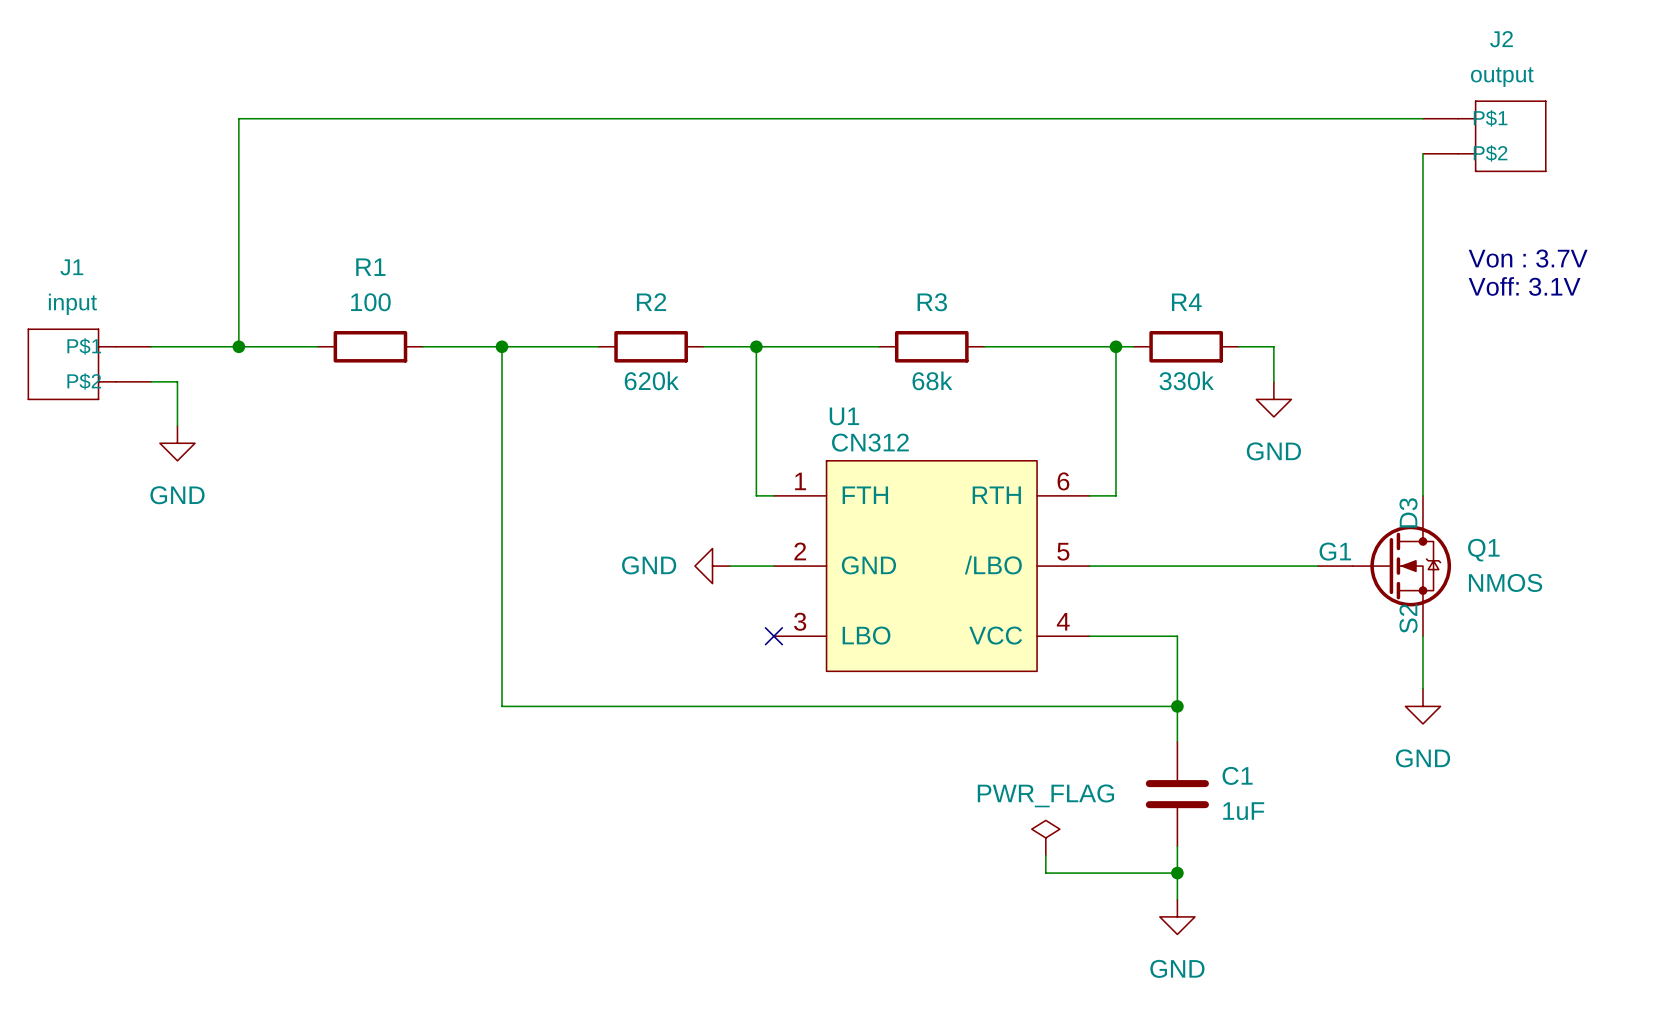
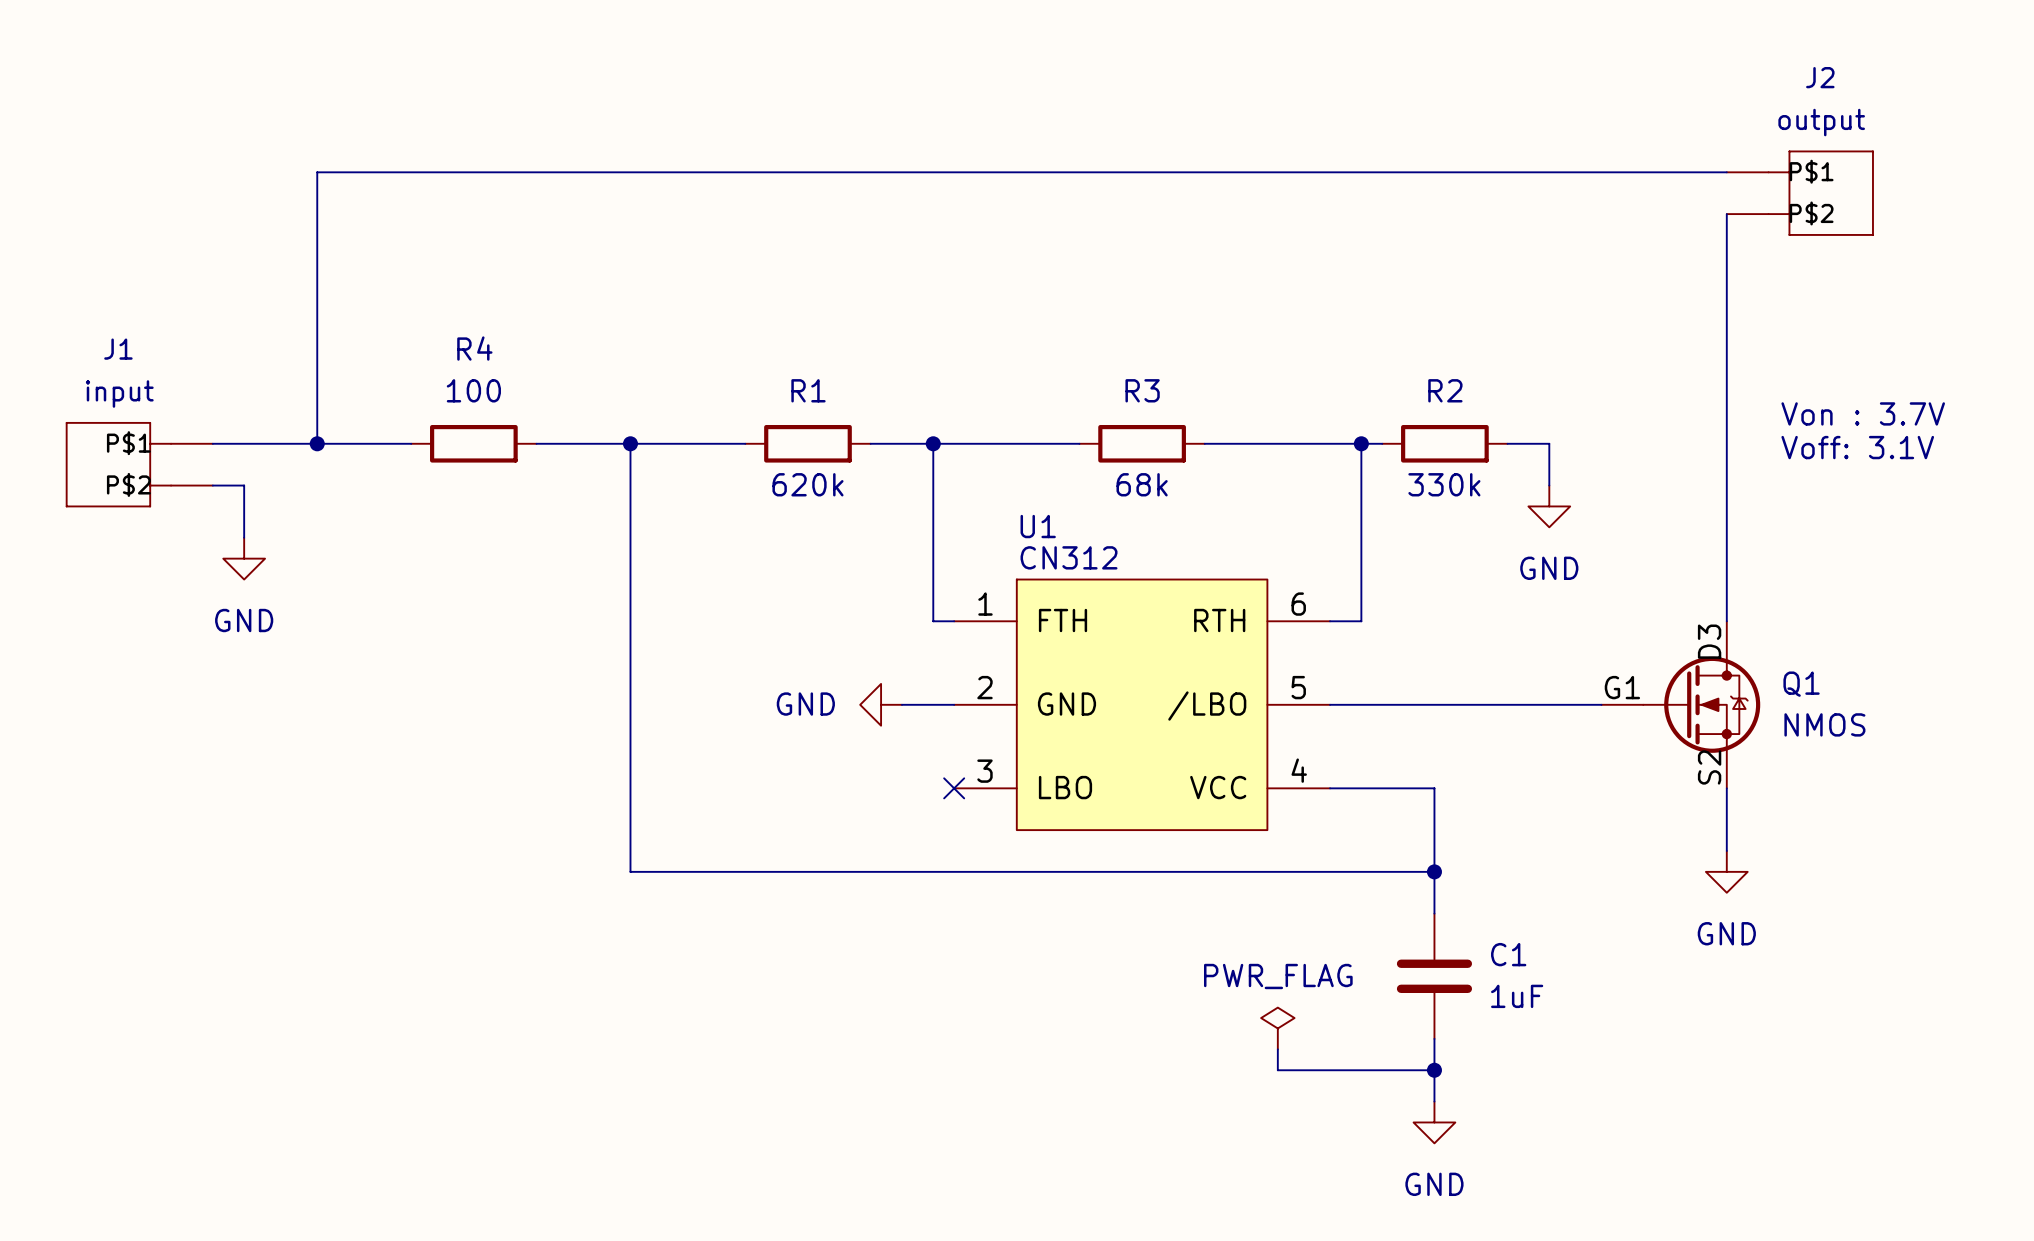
text position: Von : 3.7V (1528, 258) -> Von : 3.7V (1863, 413)
R1 name: R1 (370, 267) -> R4 (474, 348)
text position: Voff: 3.1V (1524, 286) -> Voff: 3.1V (1857, 447)
R2 name: R2 (651, 302) -> R1 (808, 390)
R4 name: R4 (1186, 302) -> R2 (1445, 390)

